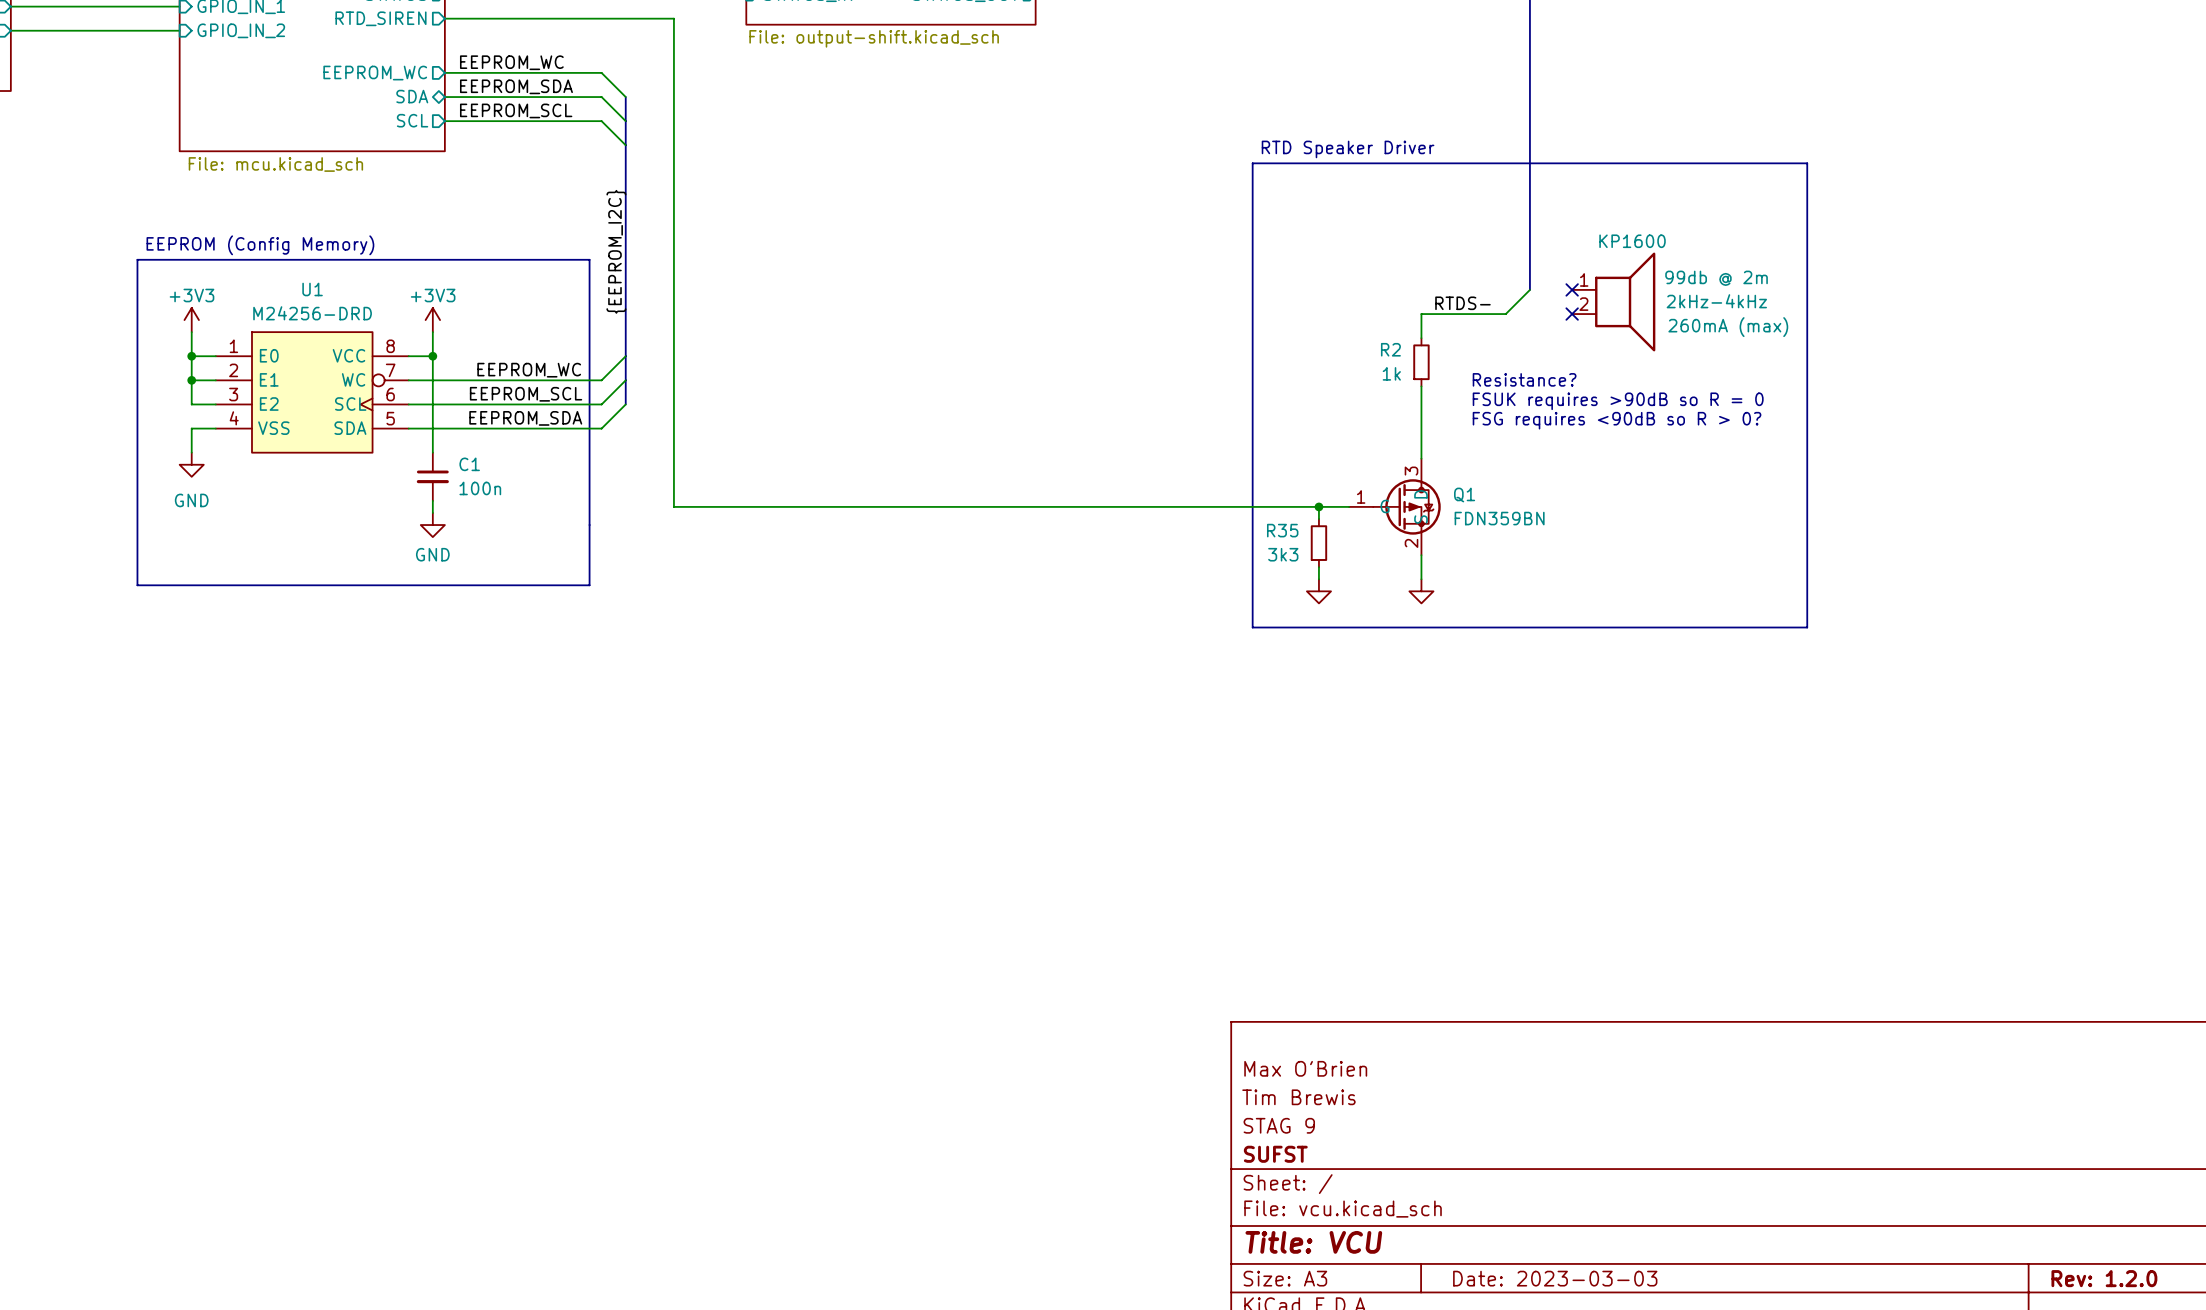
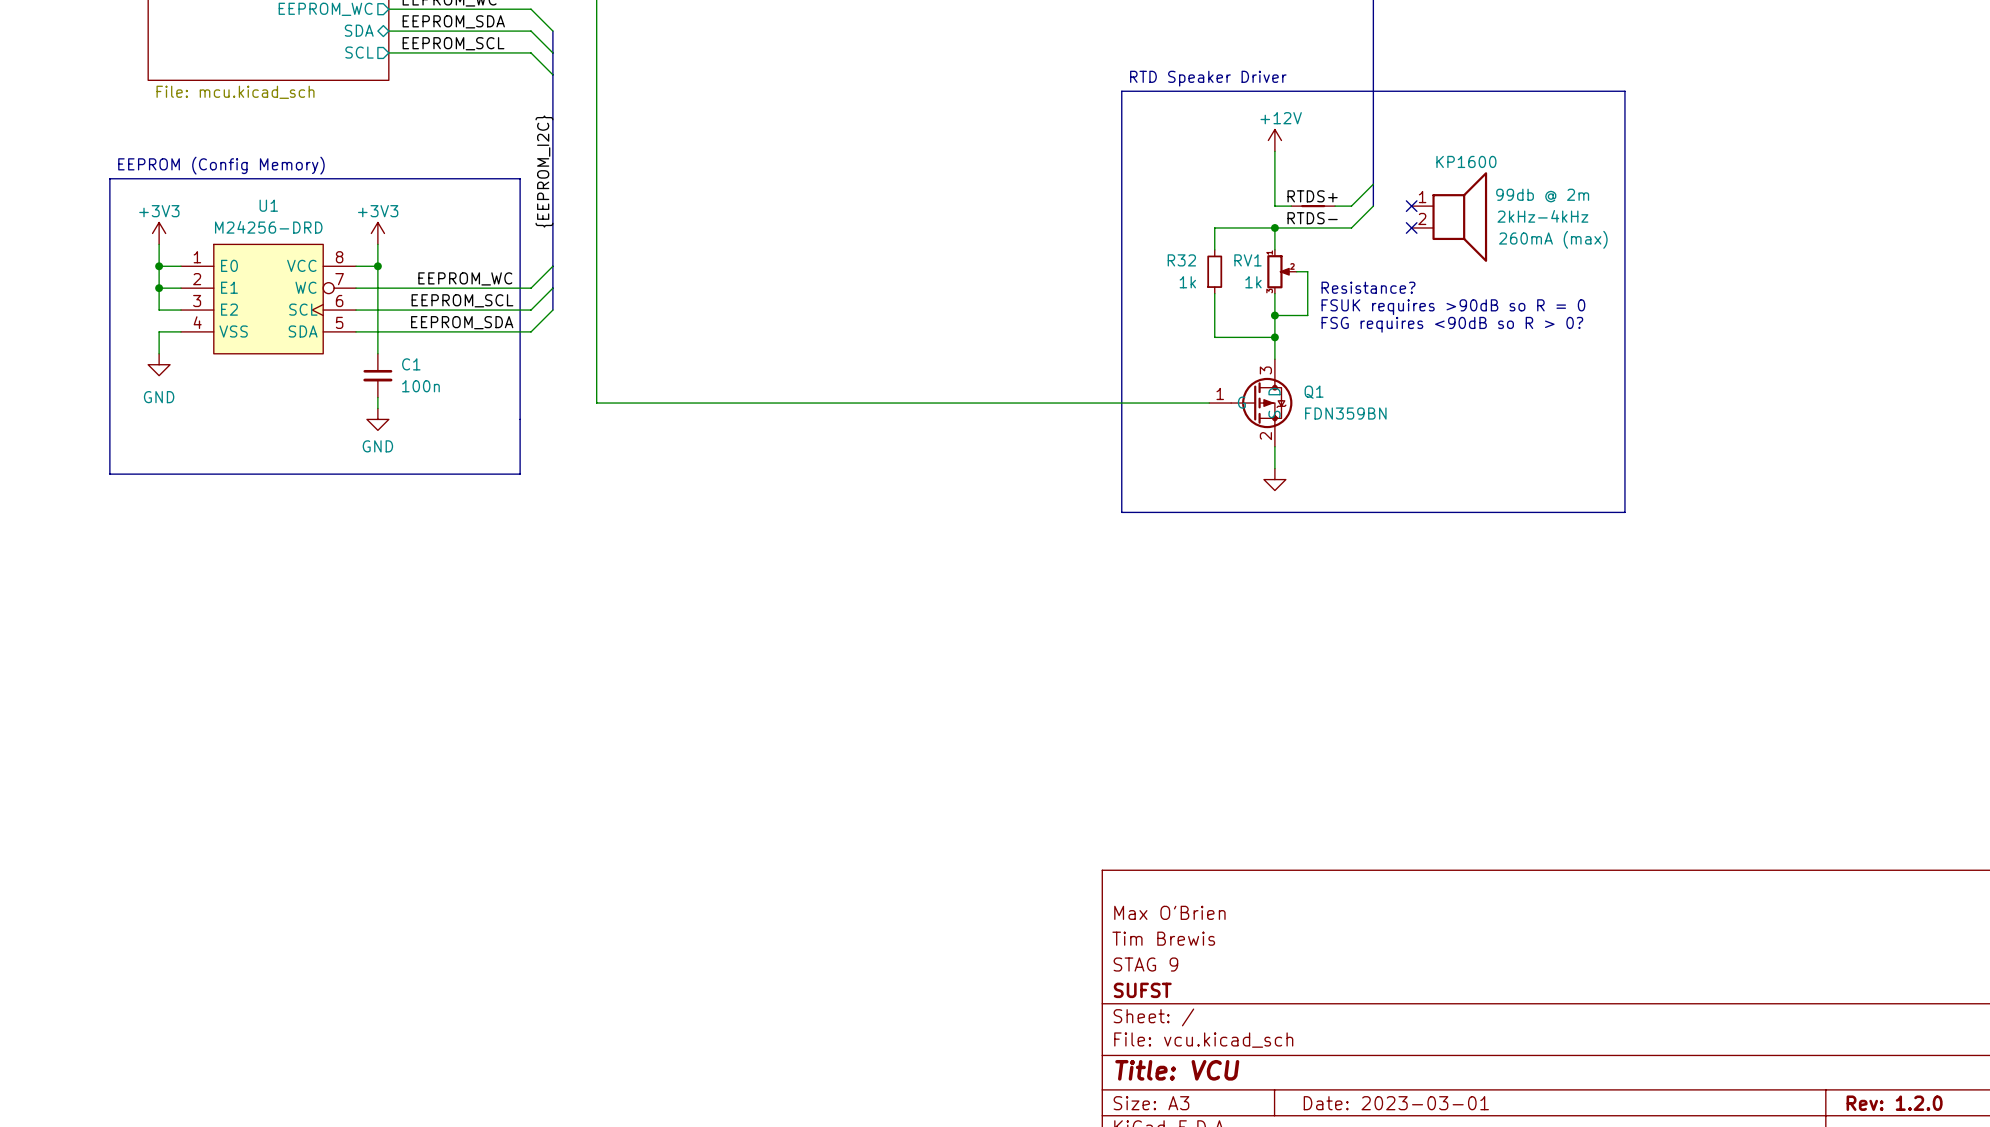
power symbol: none -> +12V (1274, 140)
wire: none -> (1274, 151) (1274, 206) (1291, 206)
wire: none -> (1373, 184) (1351, 206) (1335, 206)
label: none -> RTDS+ (1312, 196)
part: none -> (1313, 206)
wire: none -> (1274, 227) (1214, 227) (1214, 249)
junction: none -> (1274, 227)
R32: none -> 1k (1214, 271)
R2: 1k (1421, 362) -> none
RV1: none -> 1k (1282, 271)
wire: none -> (1296, 271) (1307, 271) (1307, 315) (1274, 315)
wire: none -> (1214, 293) (1214, 337) (1274, 337)
junction: none -> (1274, 315)
junction: none -> (1274, 337)
wire: (1318, 506) (1318, 519) -> none
junction: (1318, 506) -> none
R35: 3k3 (1318, 543) -> none
wire: (1318, 567) (1318, 579) -> none
power symbol: (1318, 591) -> none
title block: Date: 2023-03-03 (1555, 1278) -> Date: 2023-03-01 (1396, 1103)

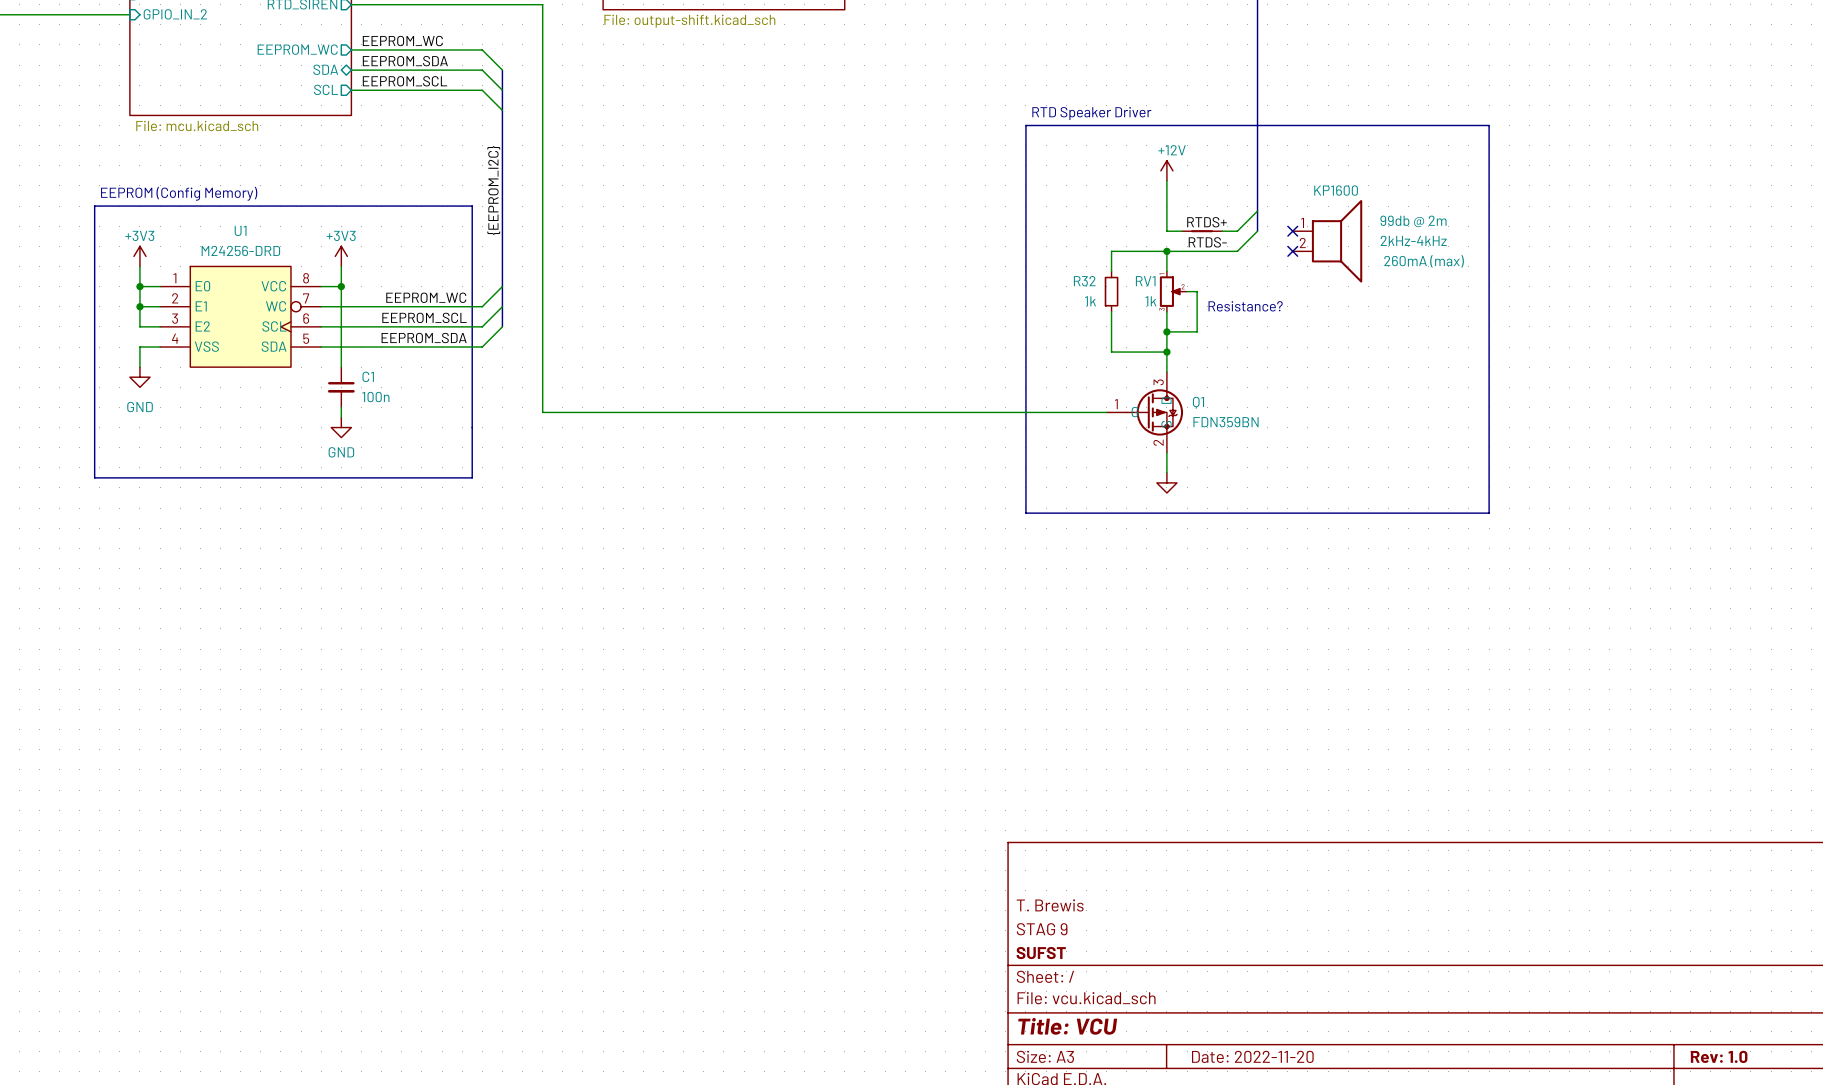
text: FSUK requires >90dB so R = 0 (1453, 307) -> none
text: FSG requires <90dB so R > 0? (1452, 324) -> none
title block: Max O'Brien (1169, 912) -> none
title block: Tim Brewis (1163, 938) -> T. Brewis (1050, 905)
title block: Date: 2023-03-01 (1396, 1103) -> Date: 2022-11-20 (1252, 1056)
title block: Rev: 1.2.0 (1894, 1103) -> Rev: 1.0 (1719, 1056)

